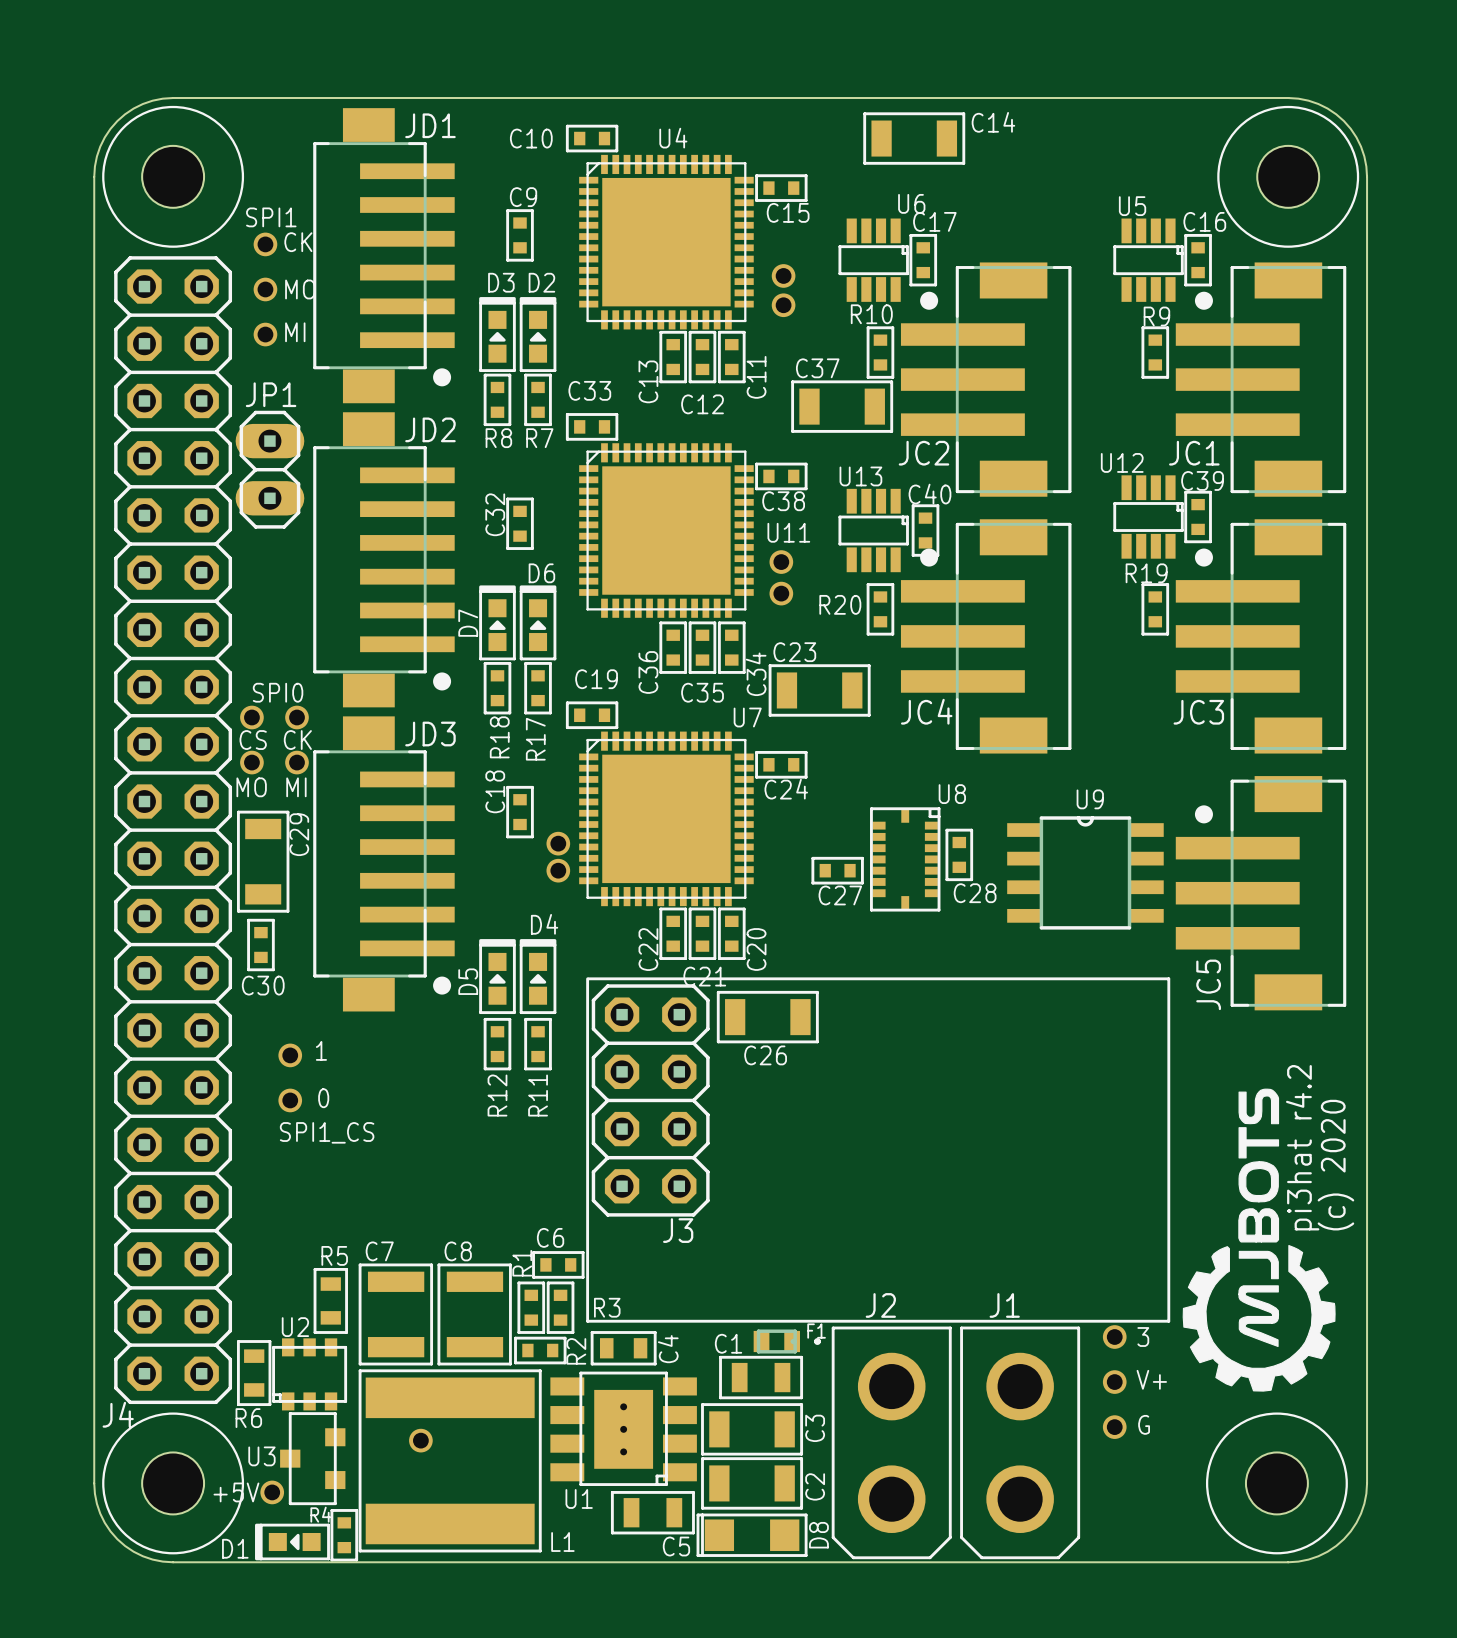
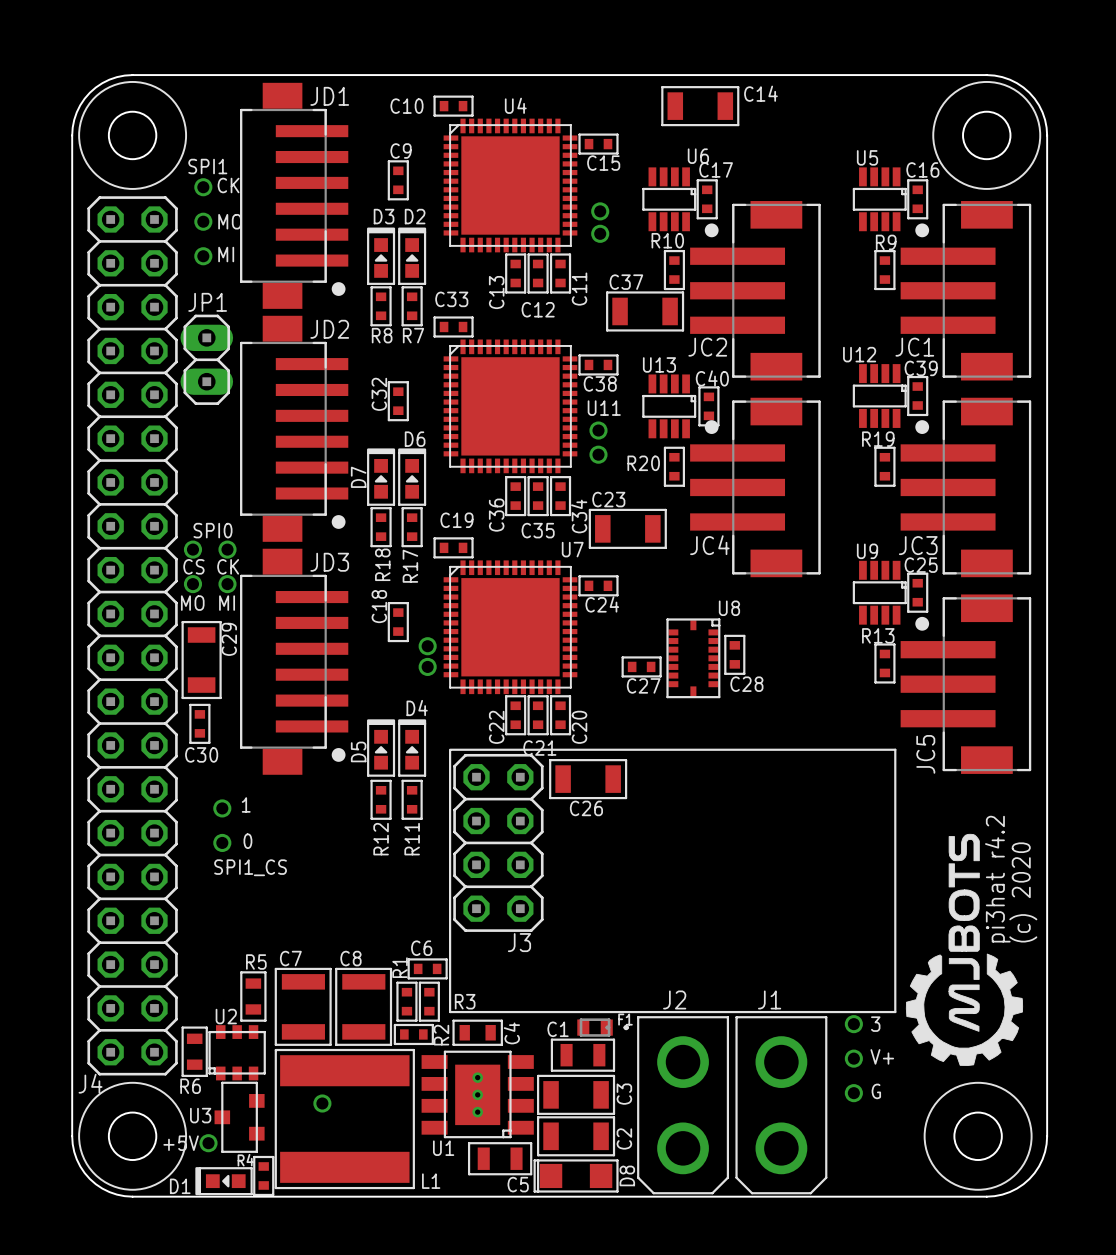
C25: none -> (917, 592)
U9 footprint: [1007, 816, 1164, 930] -> [852, 560, 907, 625]
R13: none -> (884, 663)

